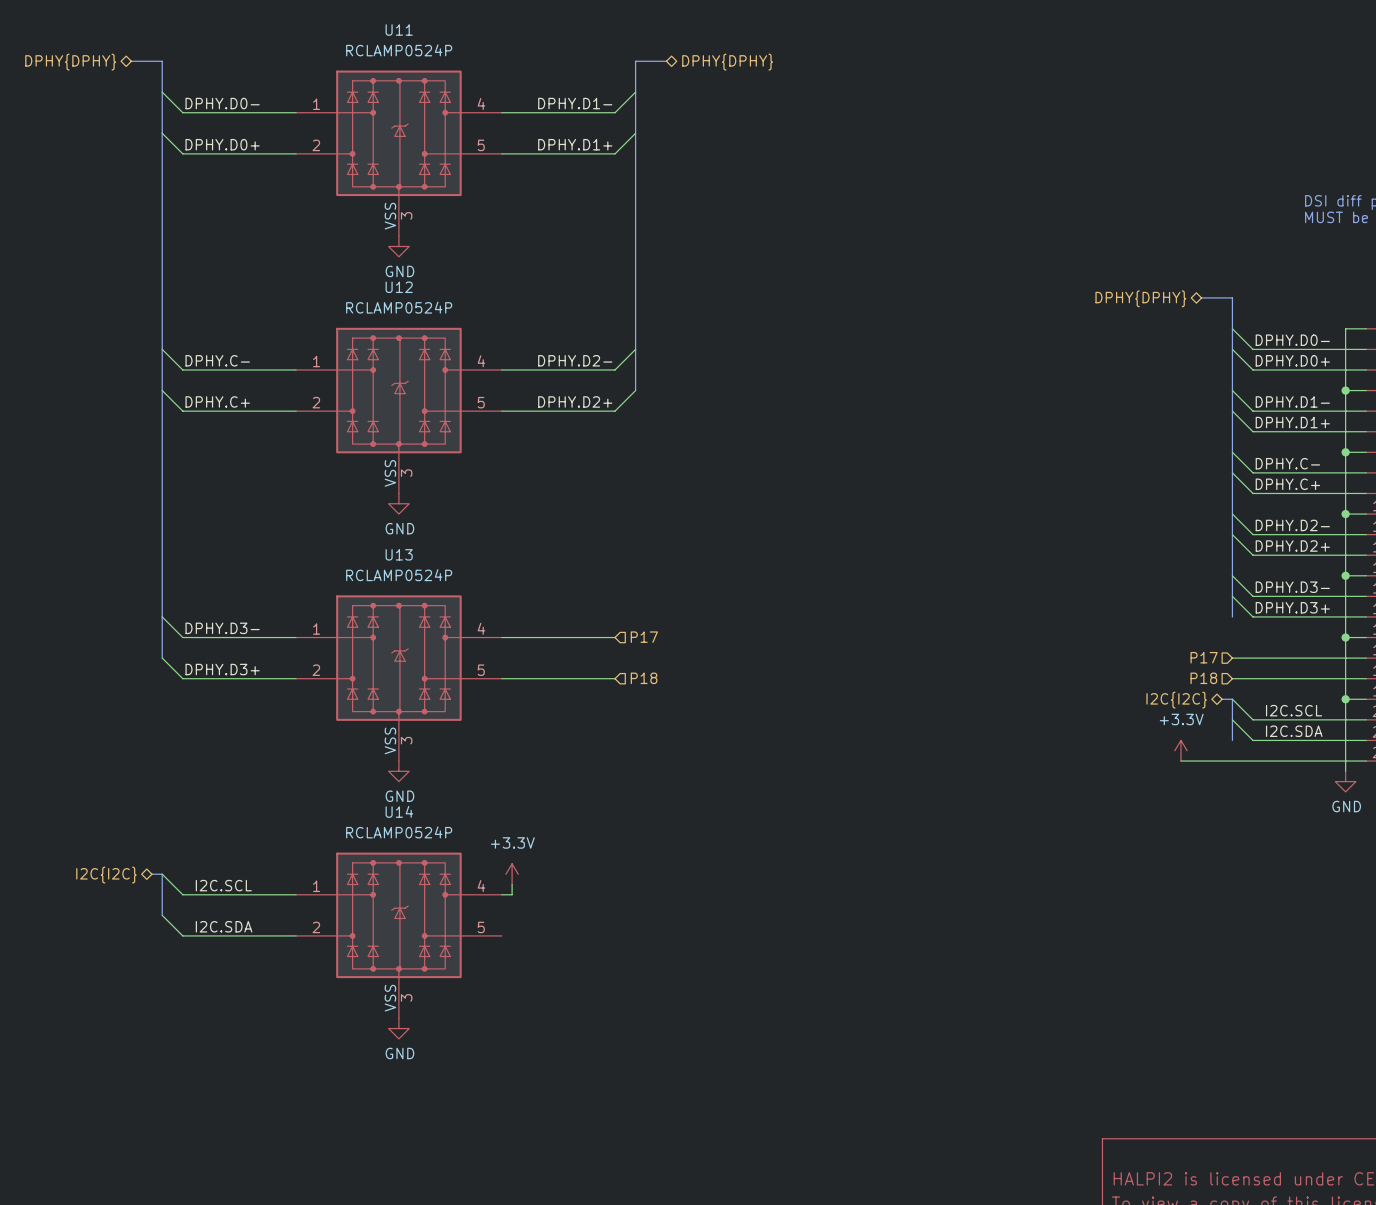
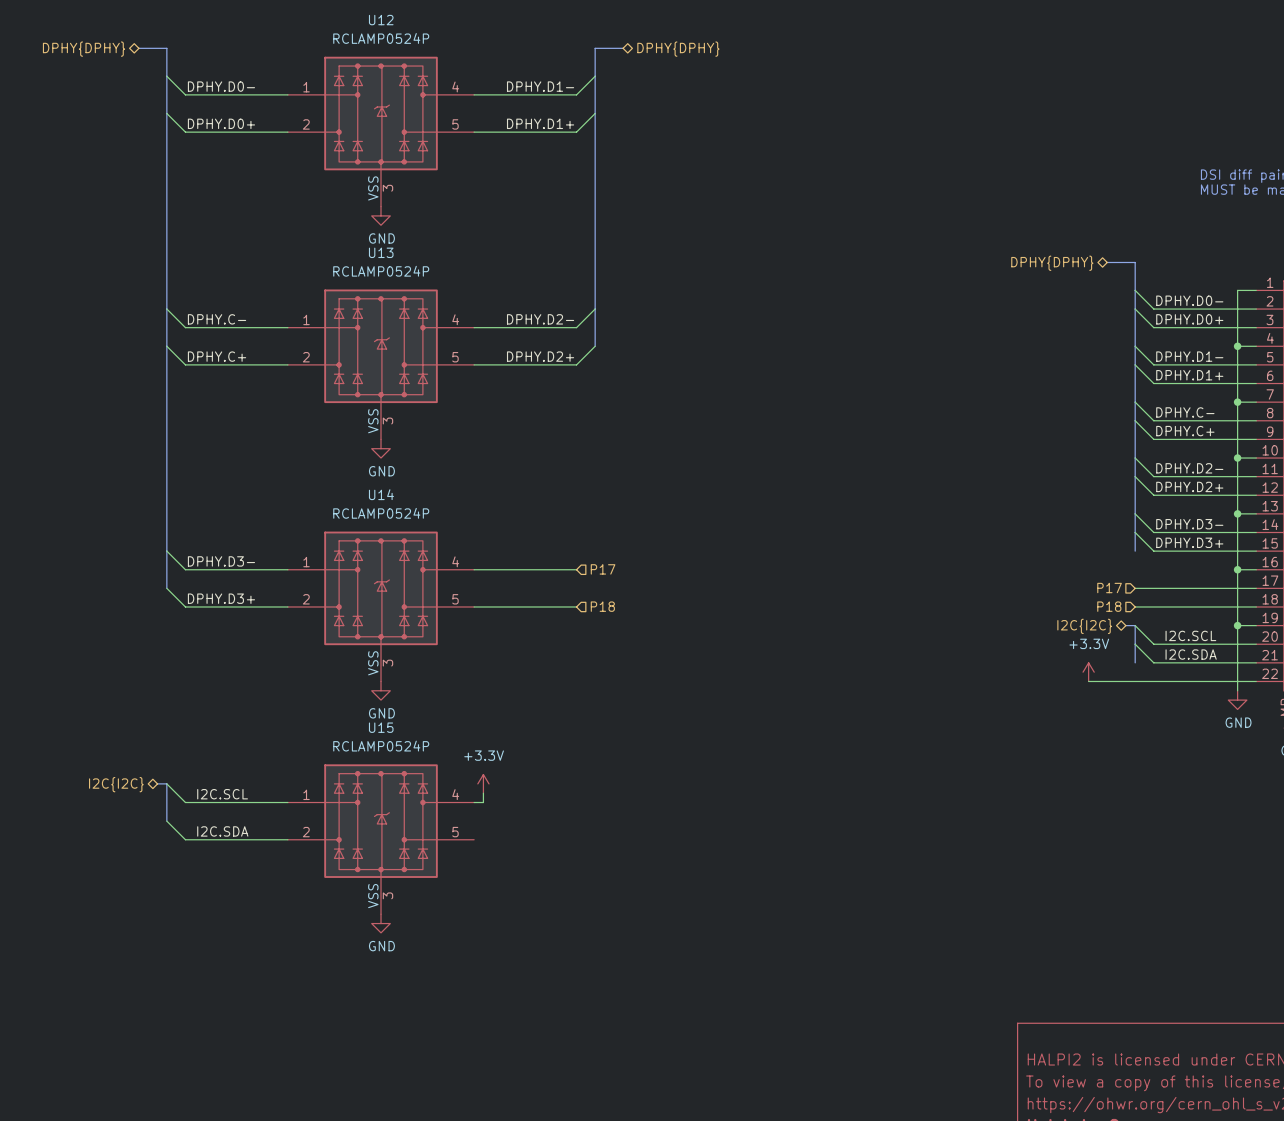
U11 name: U11 (399, 30) -> U12 (381, 20)
U12 name: U12 (399, 287) -> U13 (381, 252)
U13 name: U13 (399, 554) -> U14 (381, 494)
U14 name: U14 (399, 811) -> U15 (381, 727)

